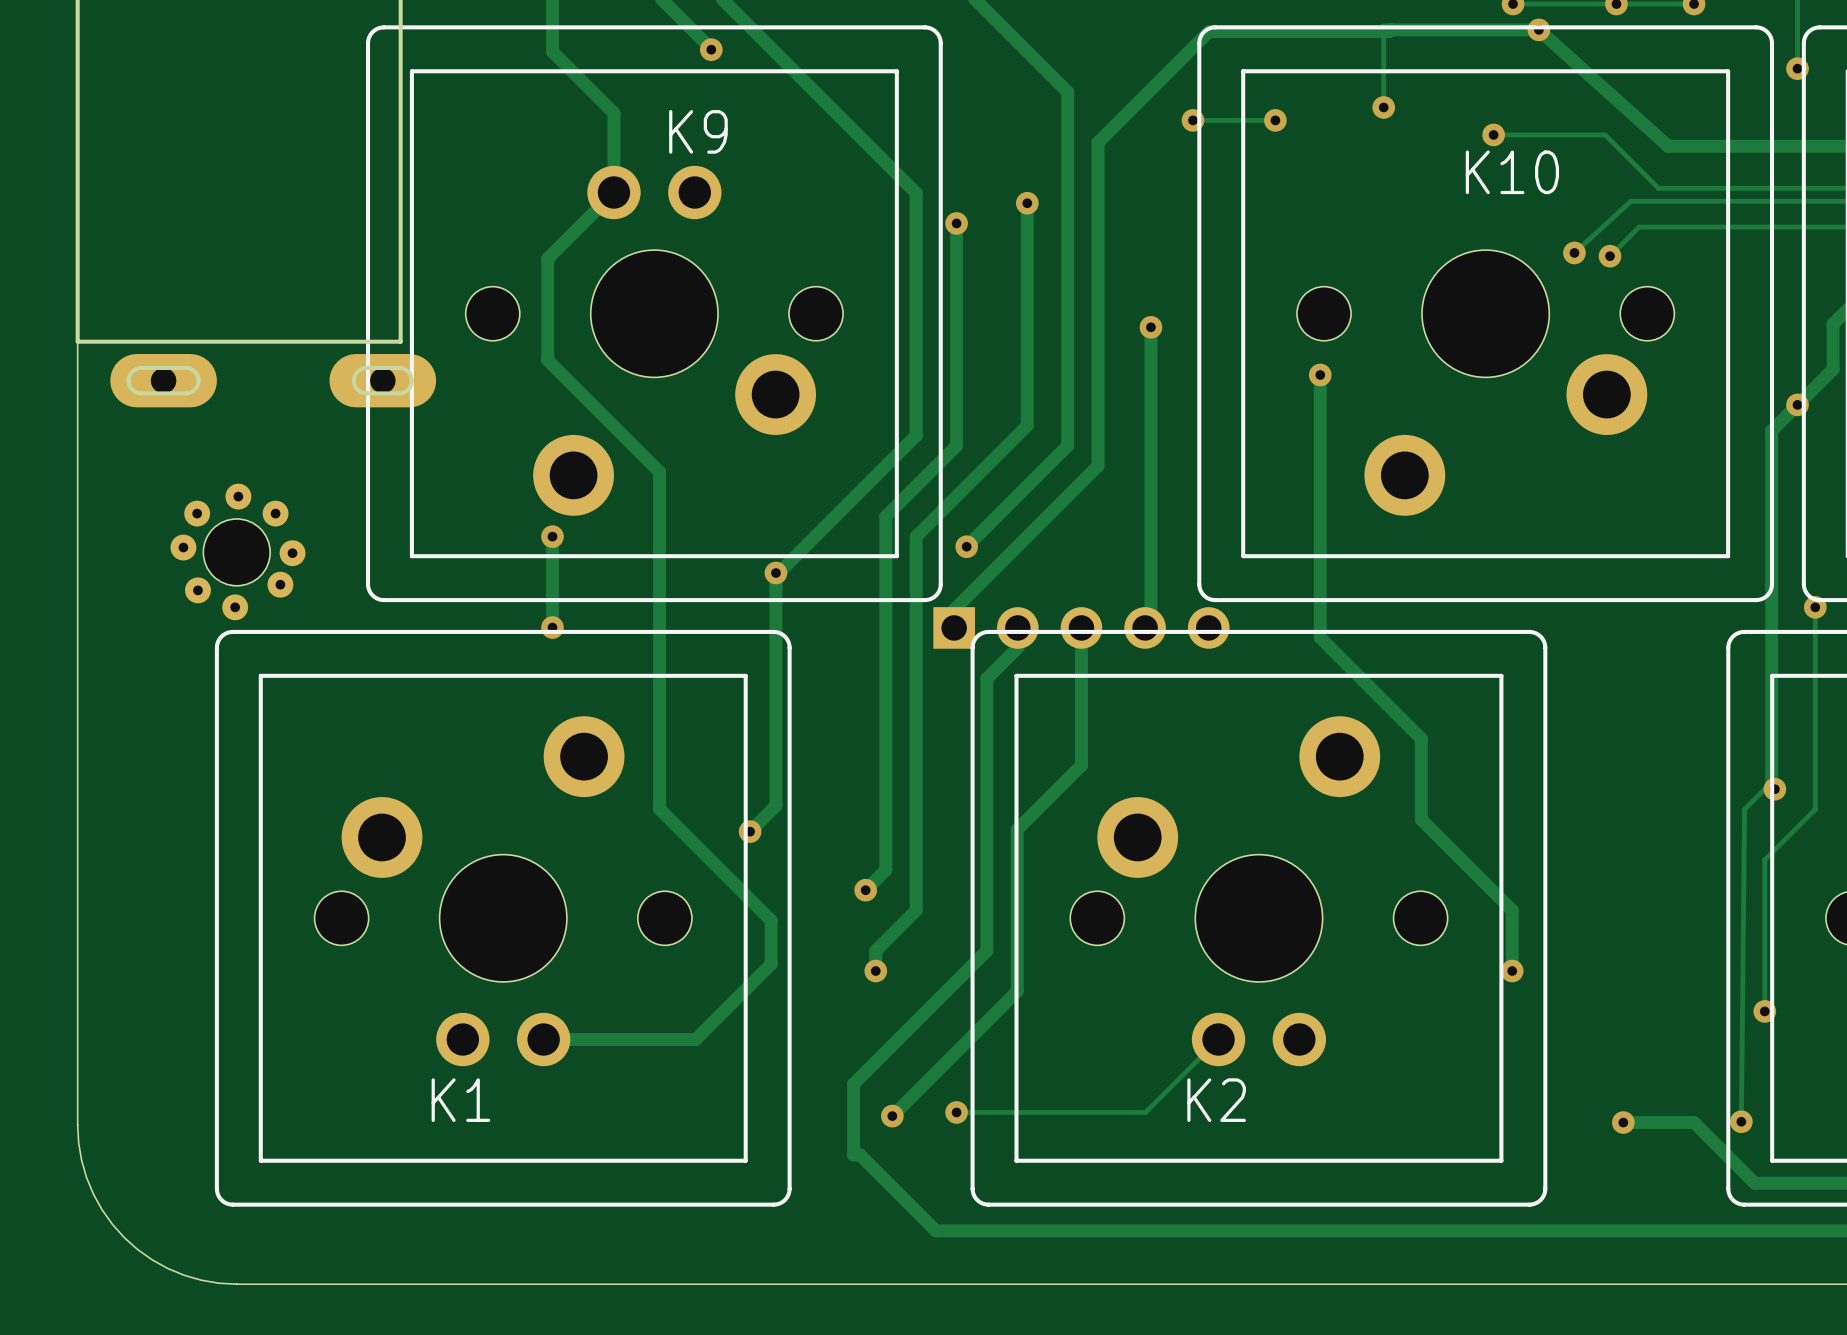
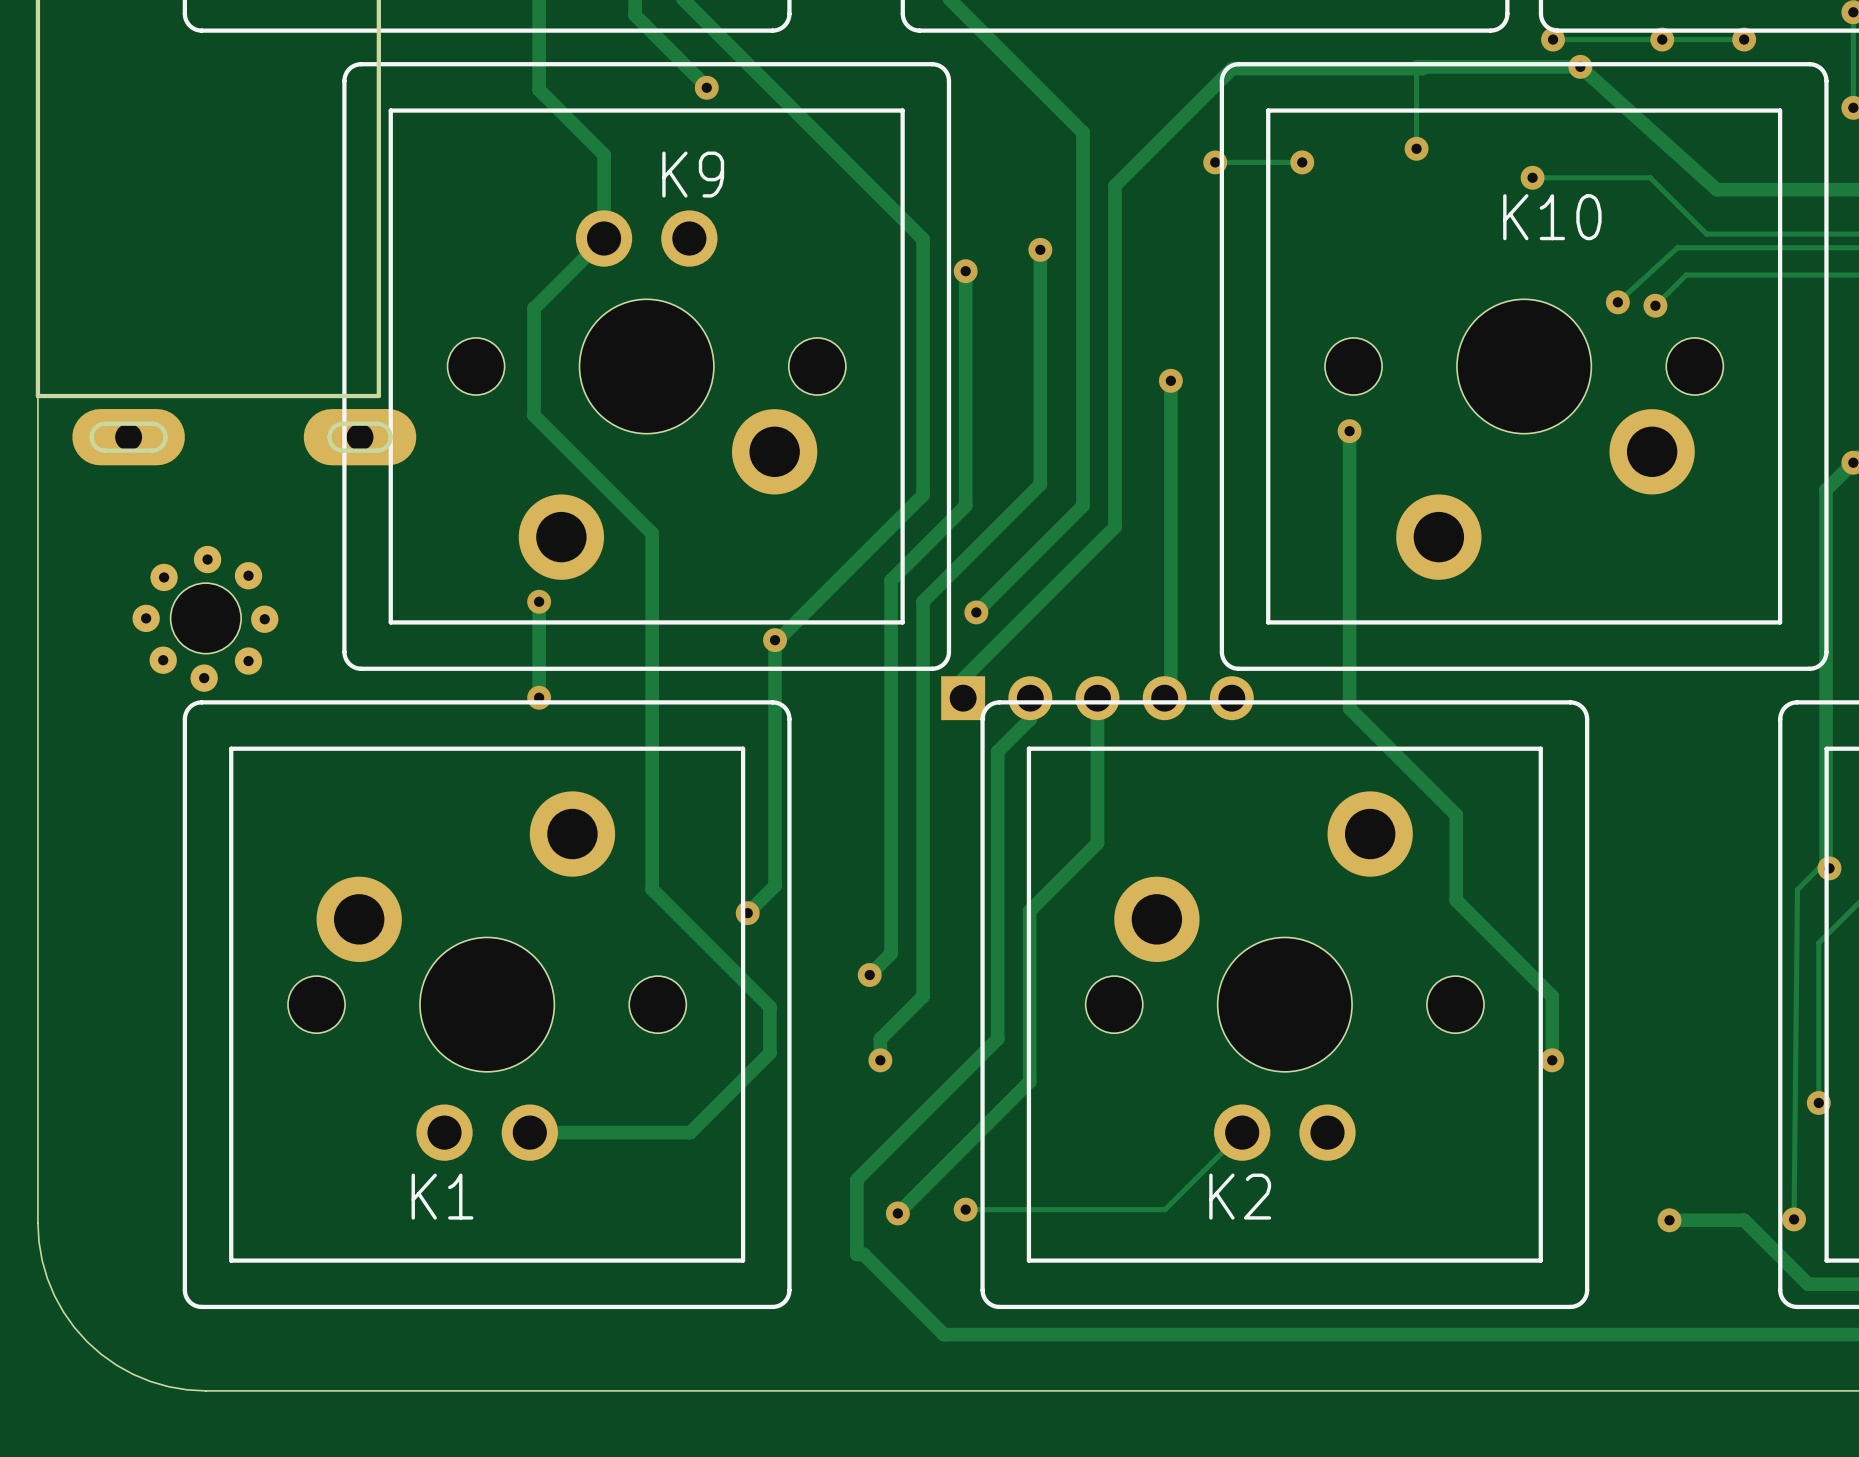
part footprint: [170, 483, 306, 621] -> [132, 545, 279, 692]

